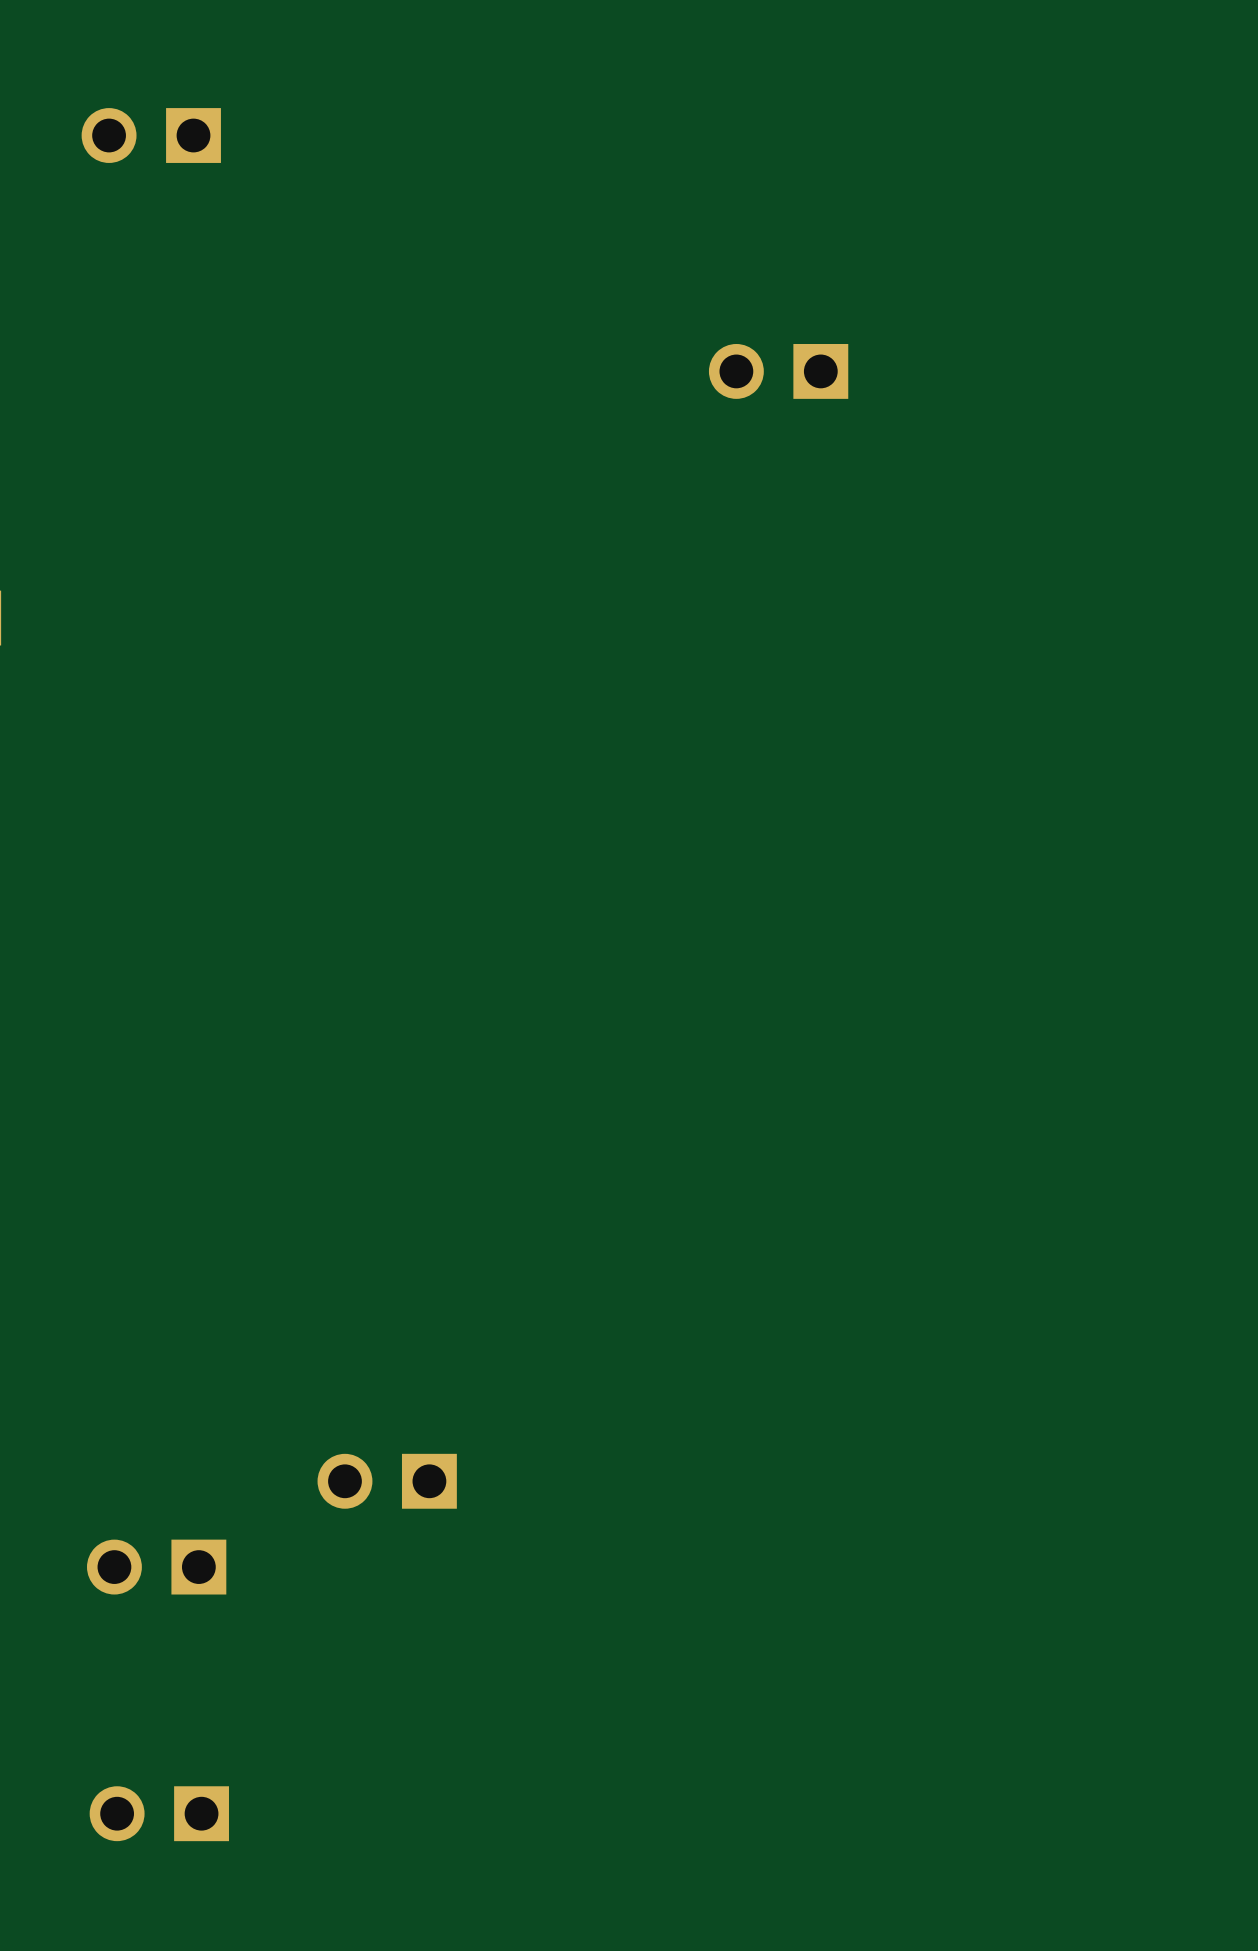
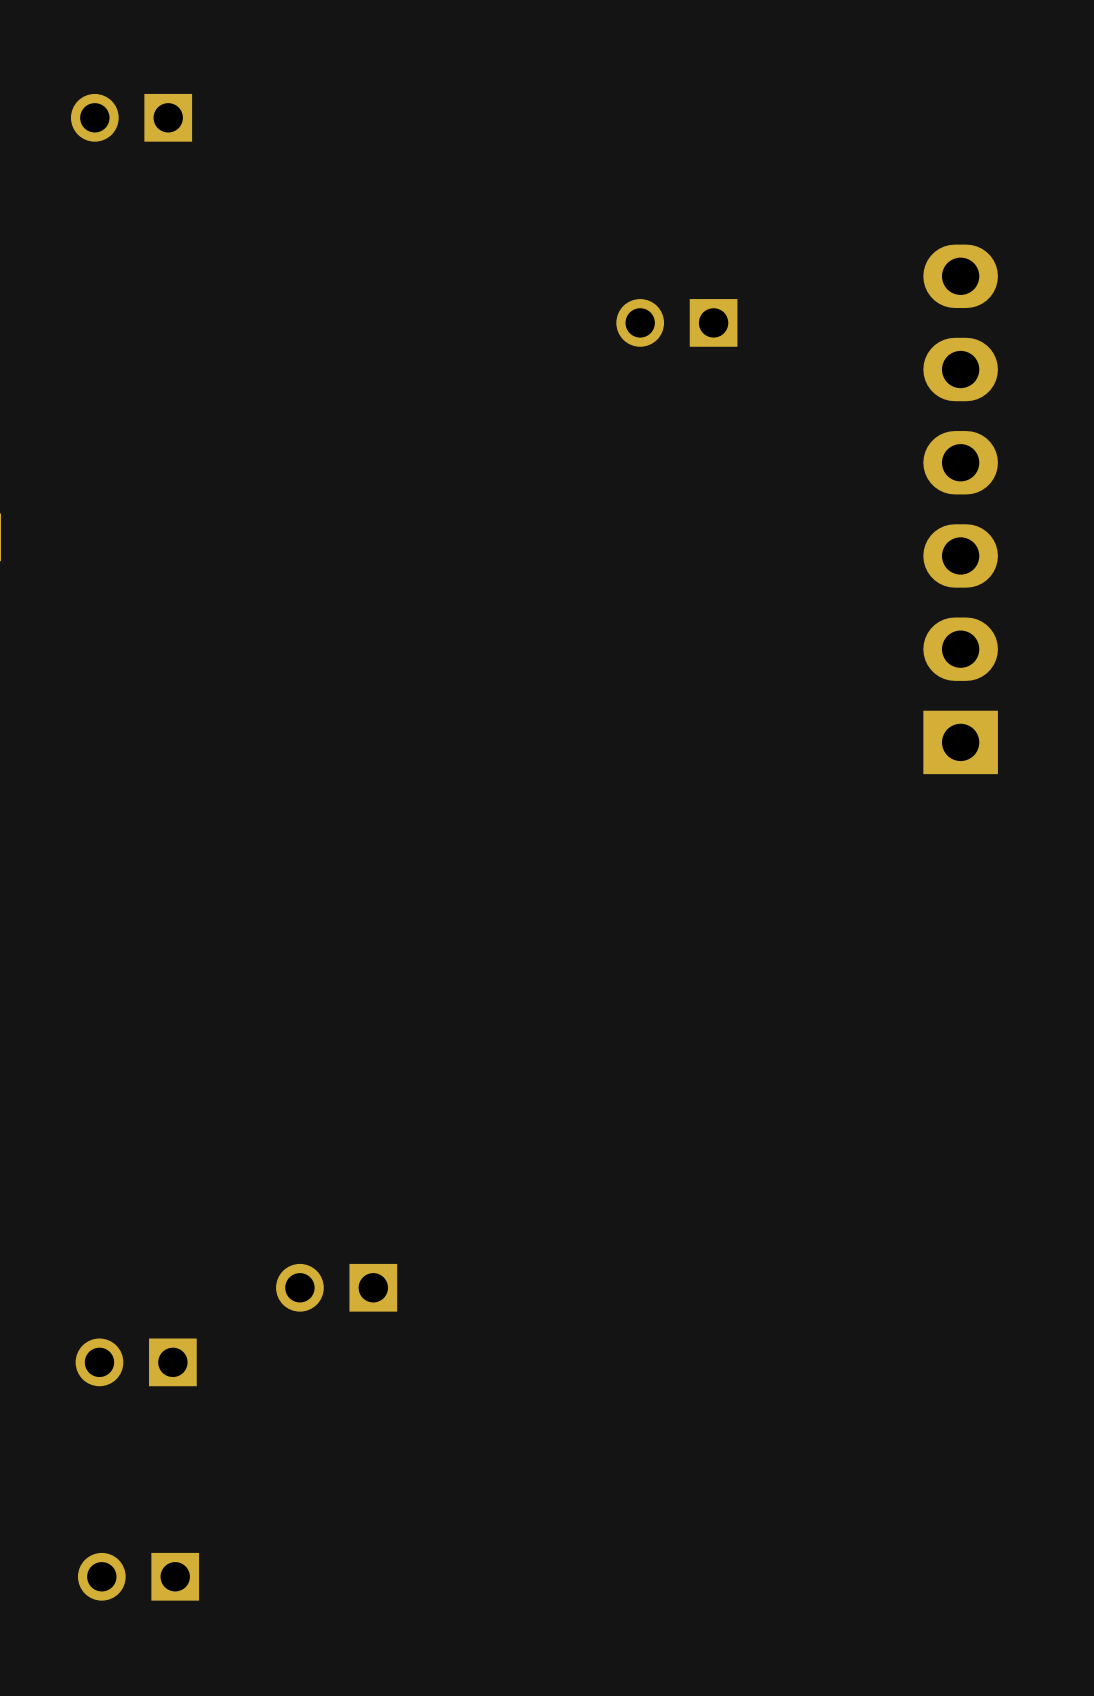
part: none -> (960, 509)

